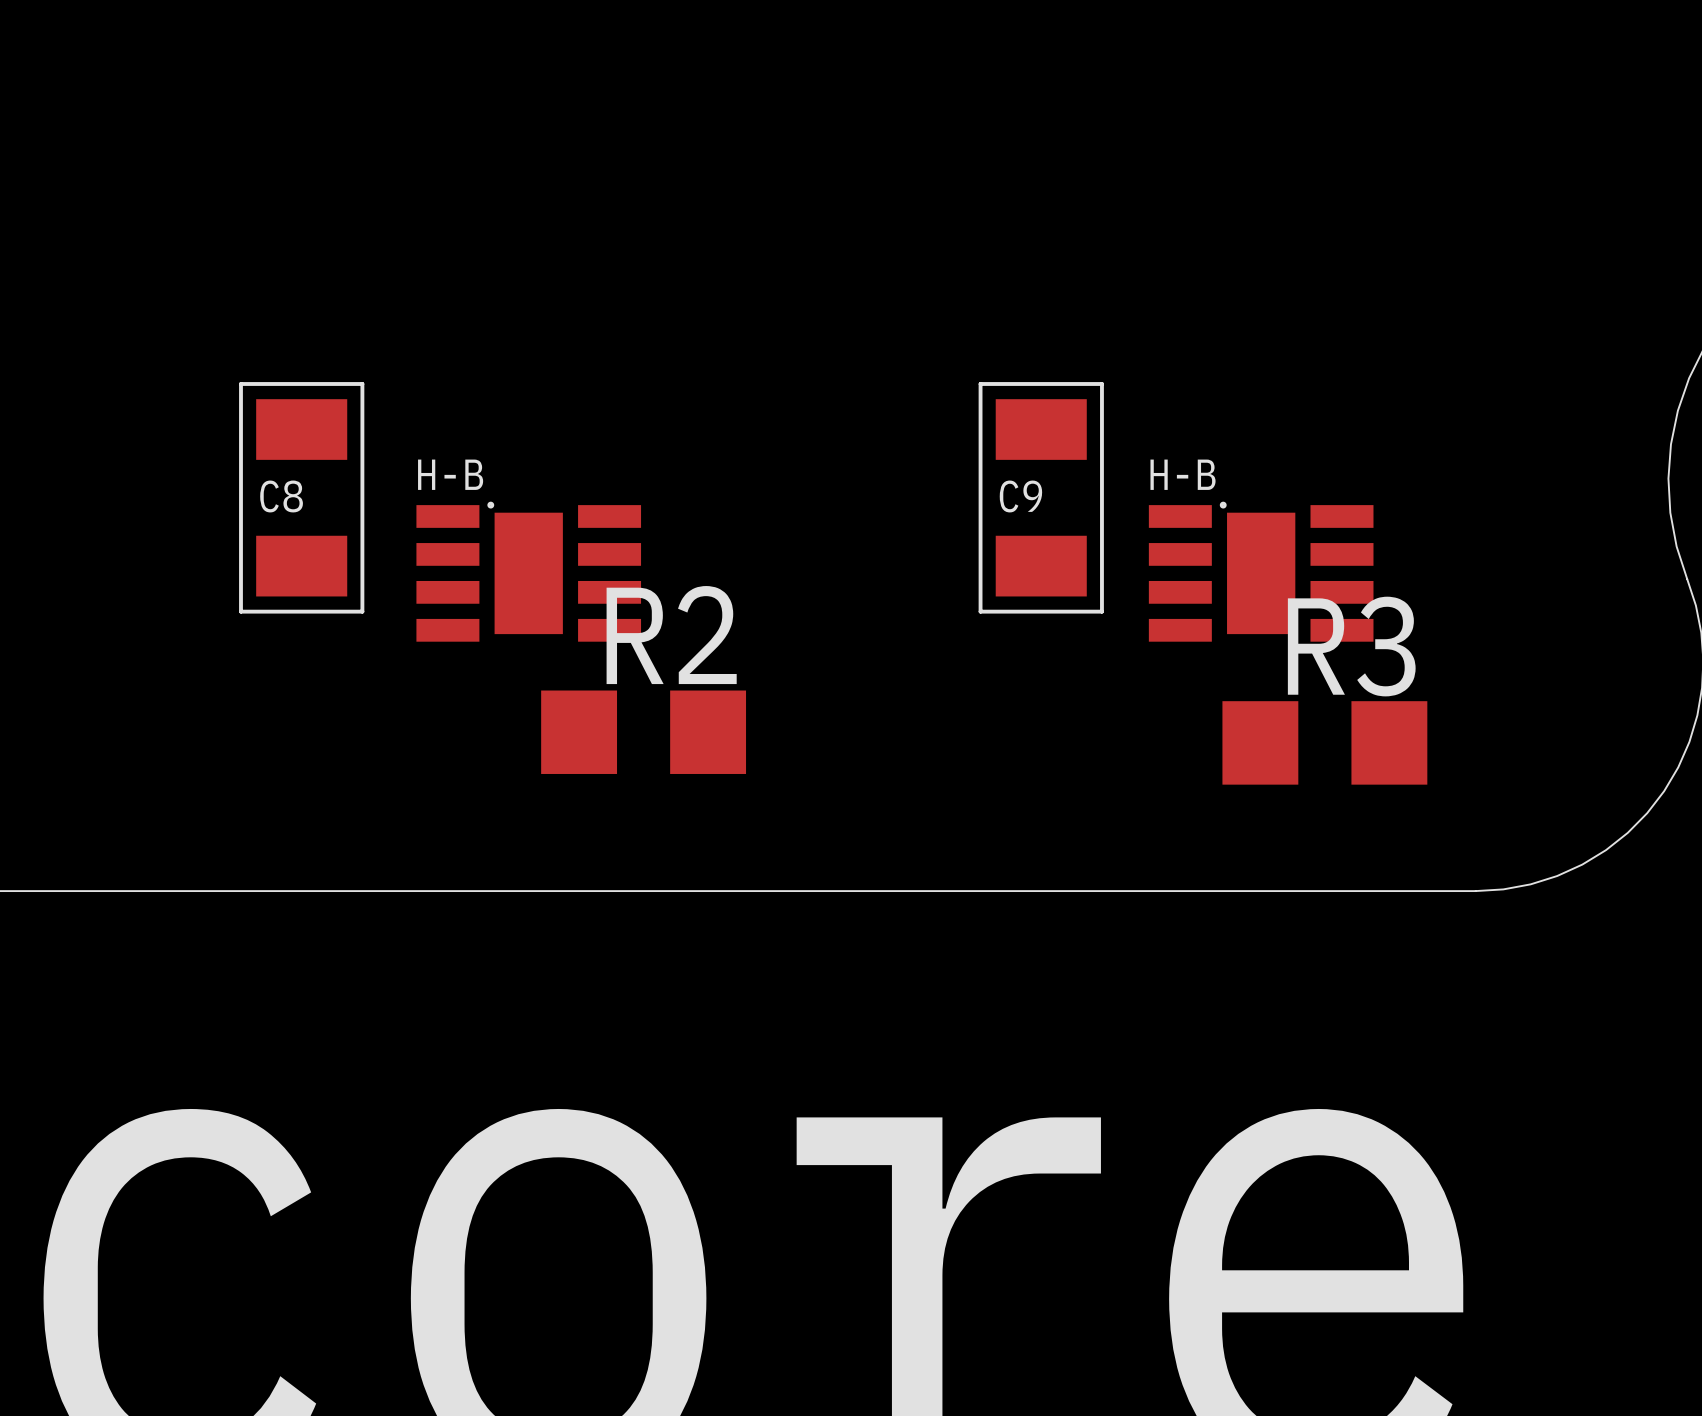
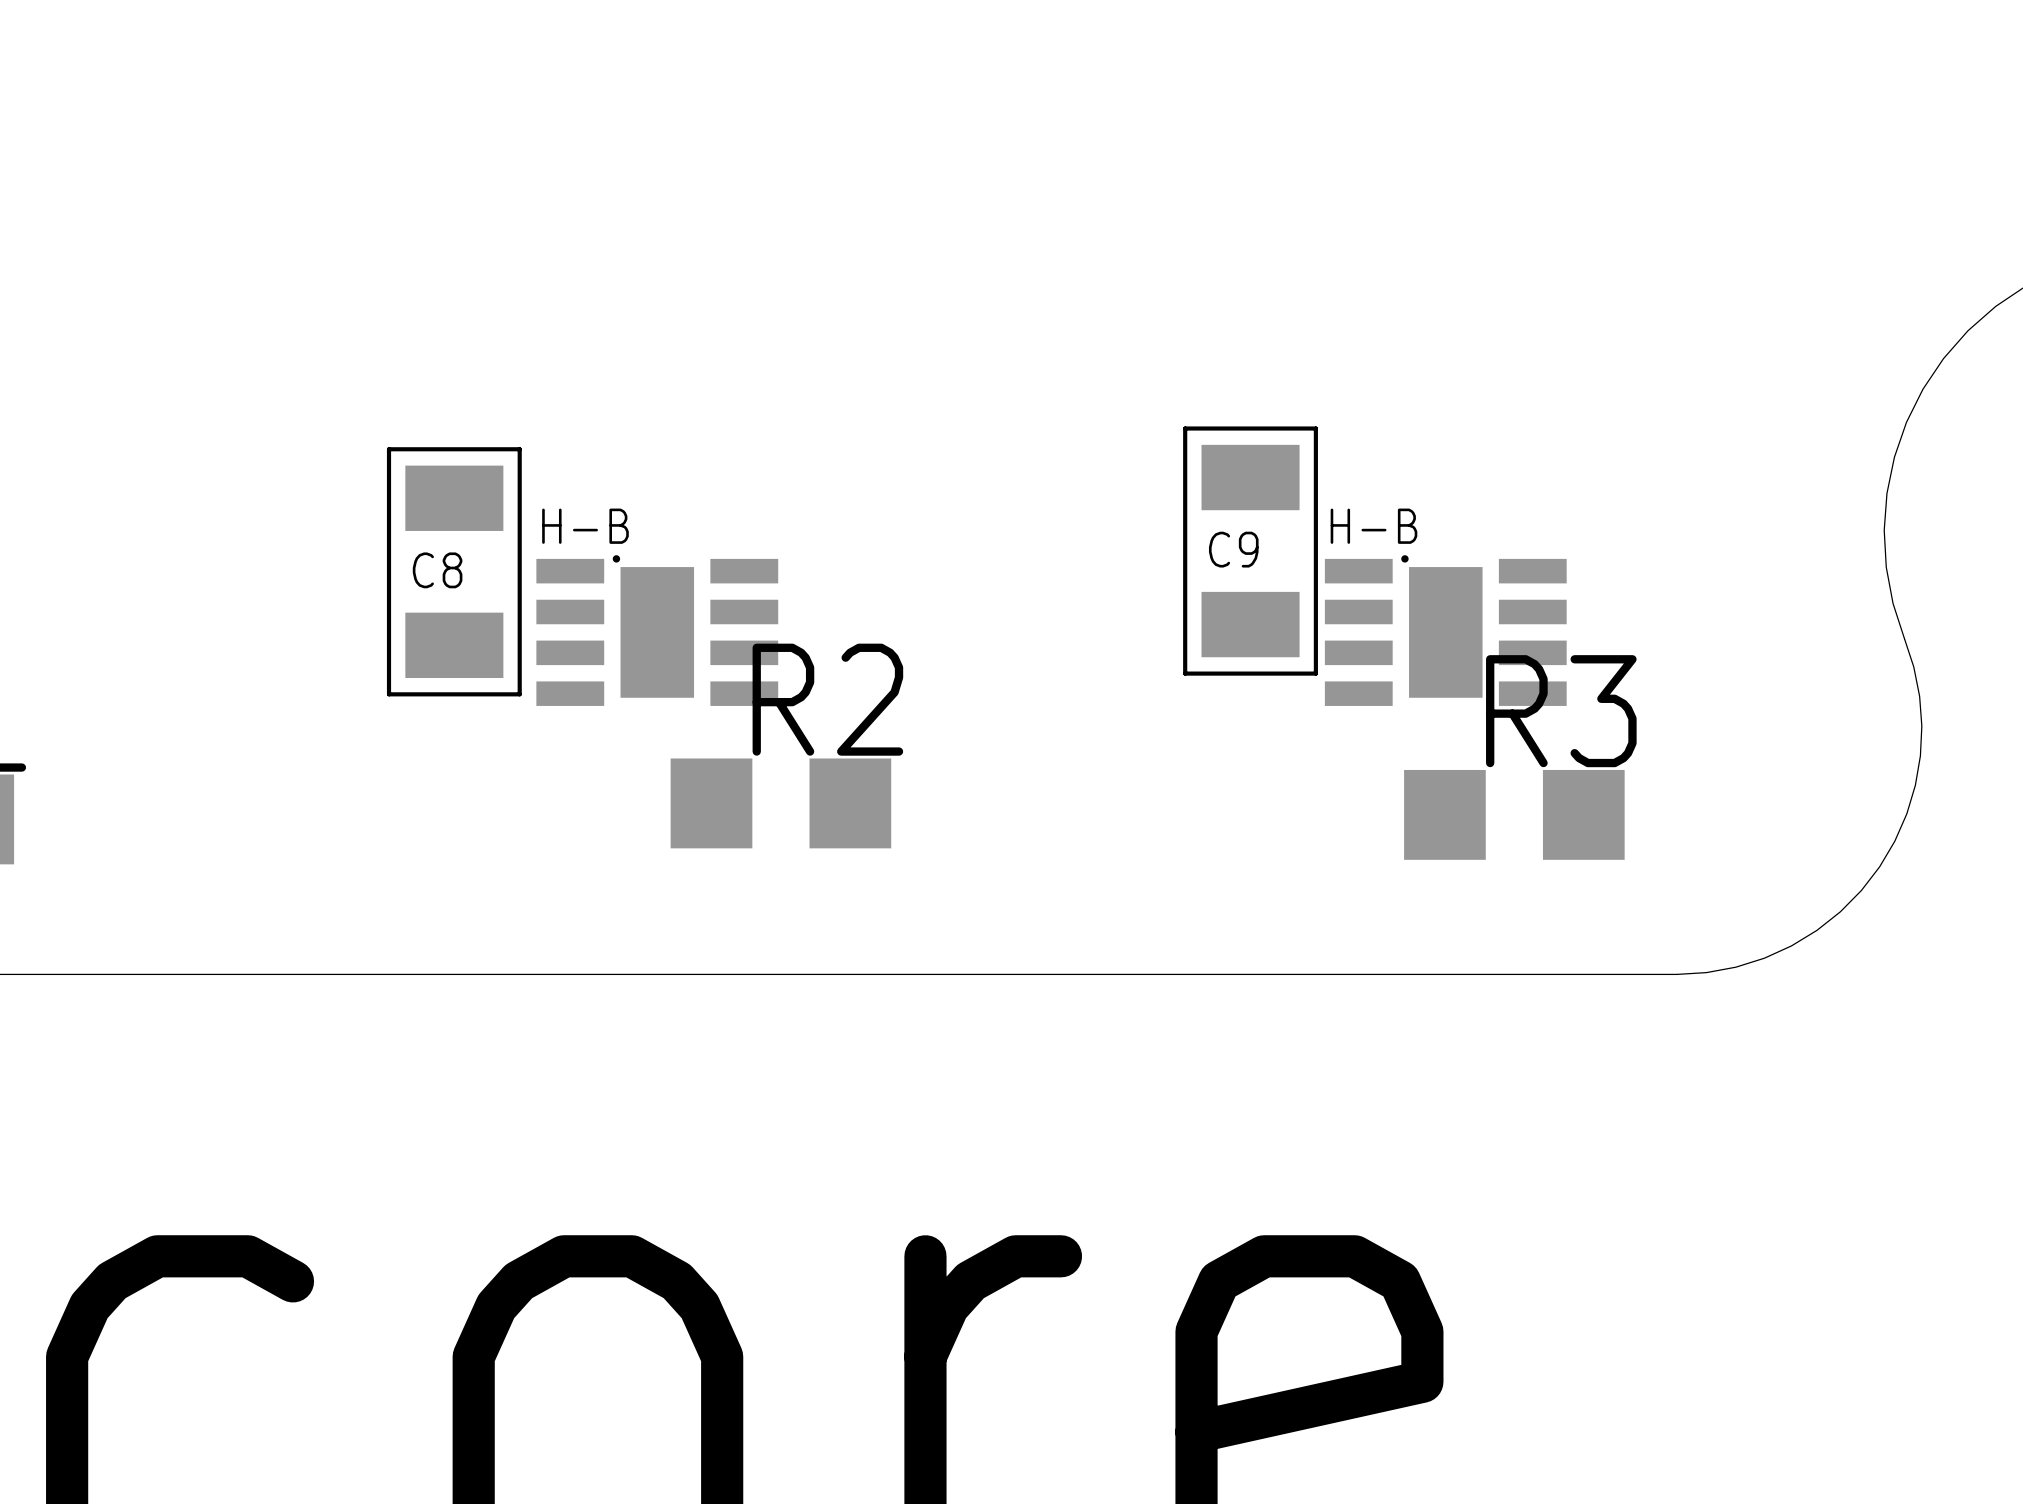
C8 position: (301, 497) -> (454, 571)
C9 position: (1041, 497) -> (1250, 551)

